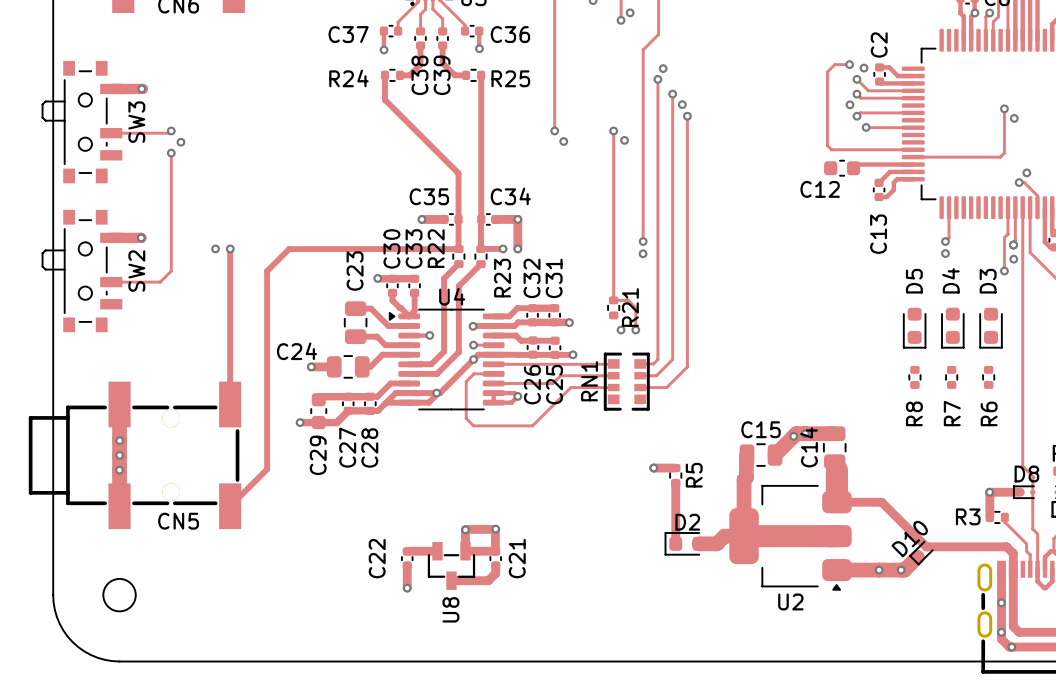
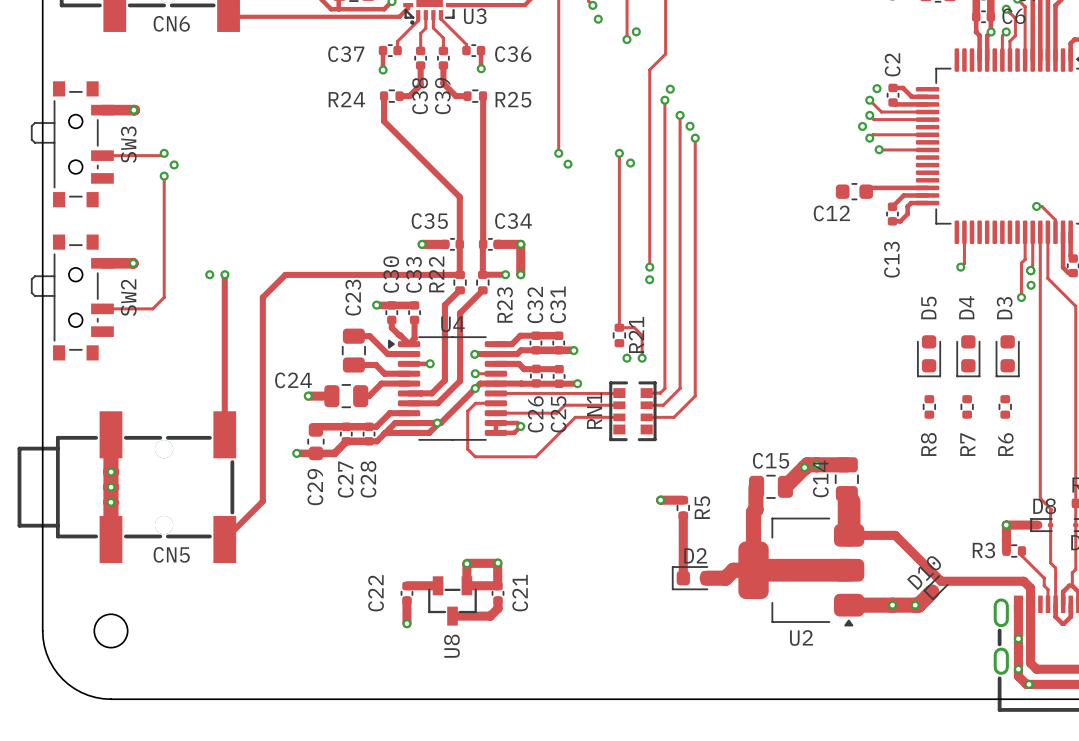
track: (849, 64) (834, 64) (827, 71) (827, 145) (831, 149) (913, 149) -> none
via: (849, 64) -> none
track: (1004, 108) (1004, 153) (1000, 157) (913, 157) -> none
via: (1004, 108) -> none
via: (1014, 118) -> none
via: (1026, 172) -> none
via: (945, 253) -> none

